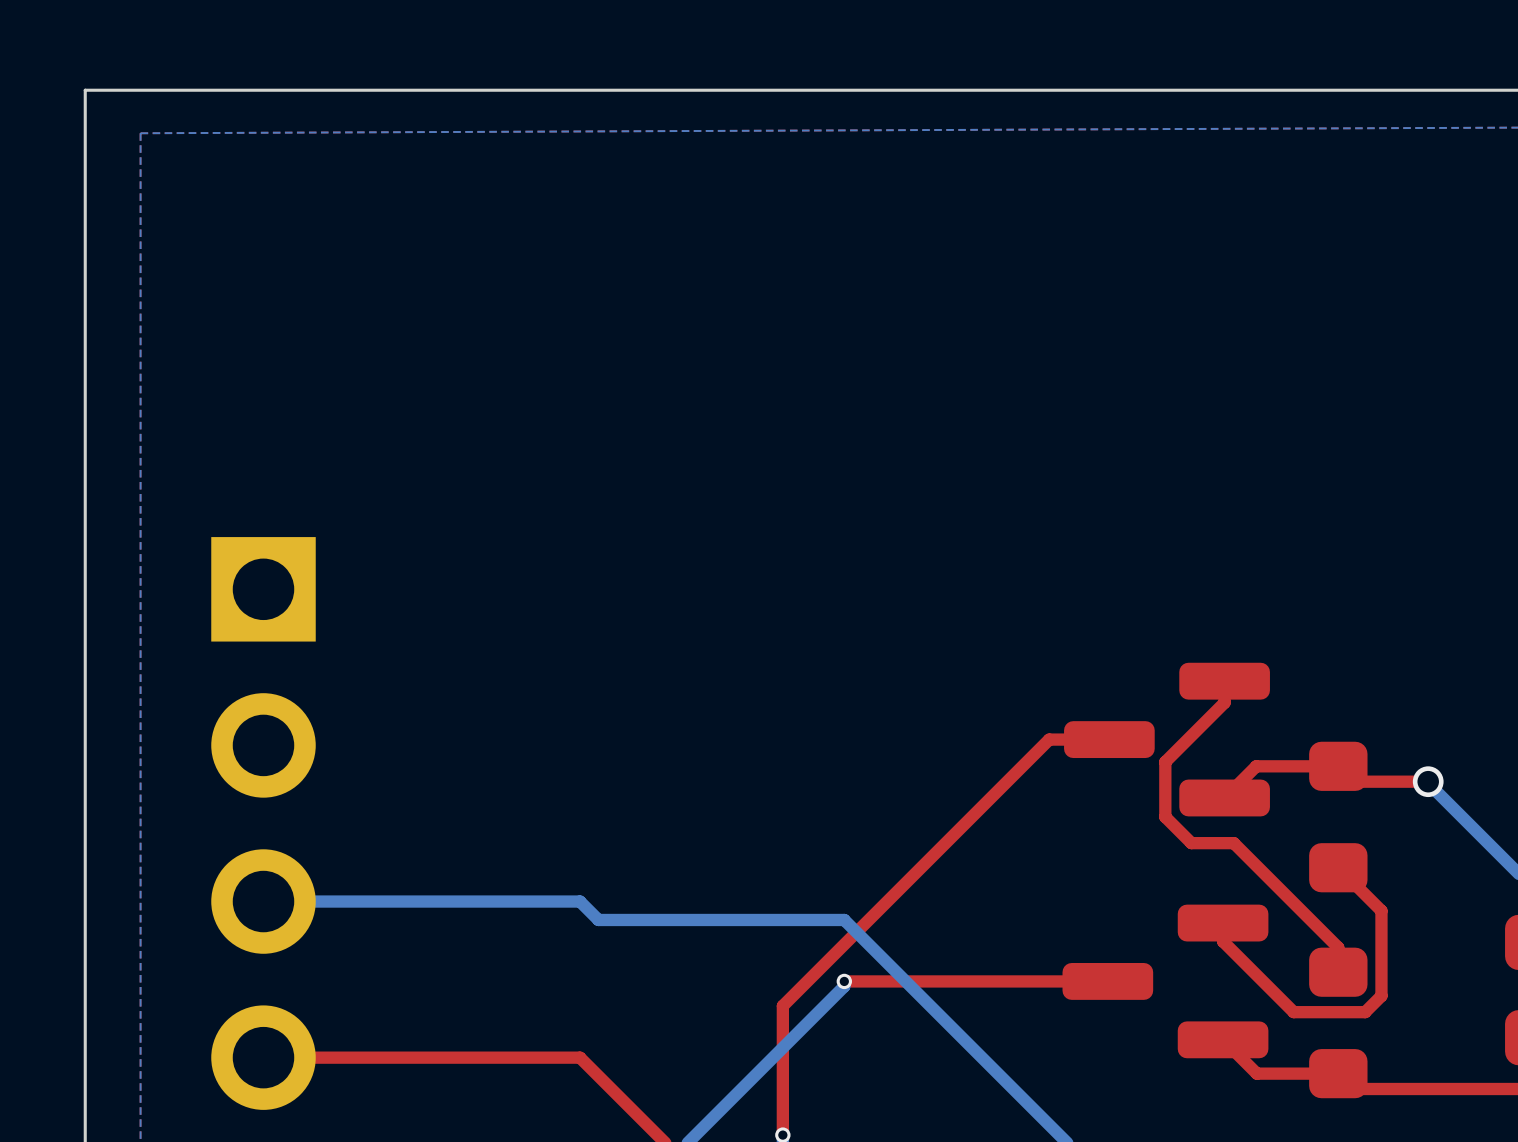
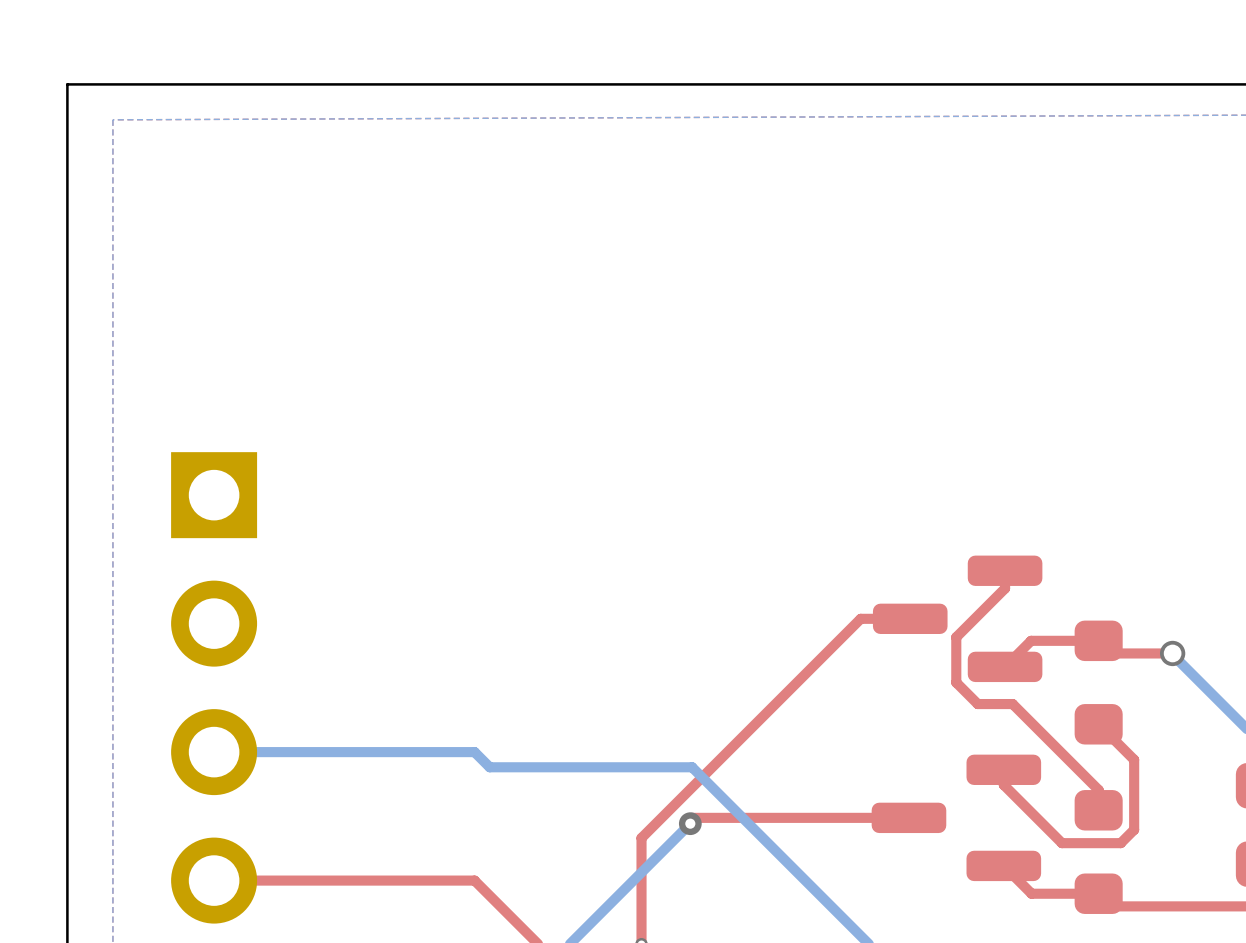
via size: [836, 973, 853, 990] -> [678, 812, 702, 836]

